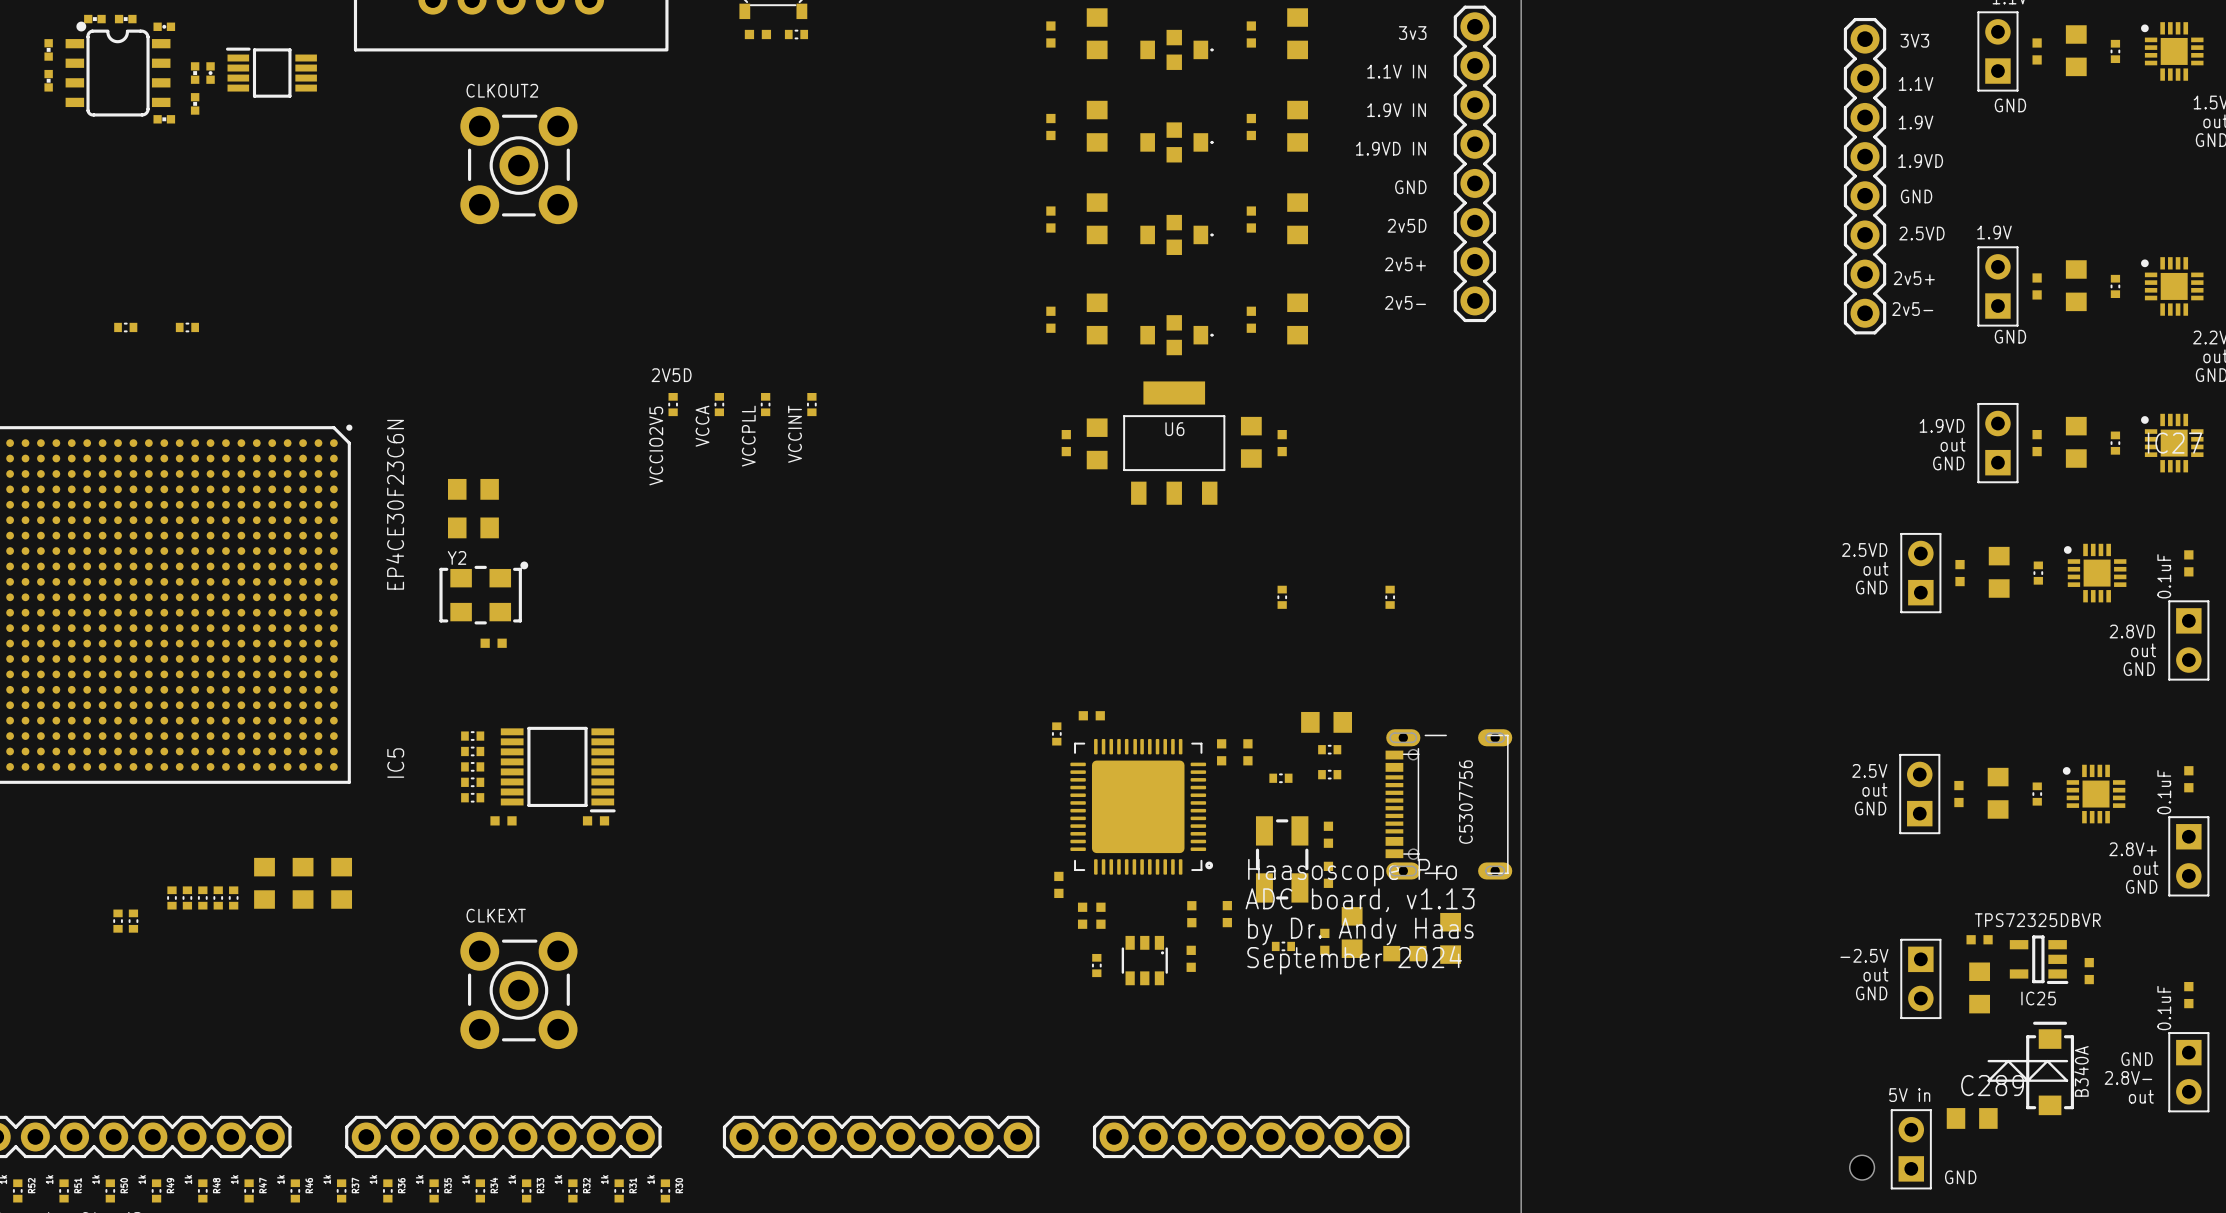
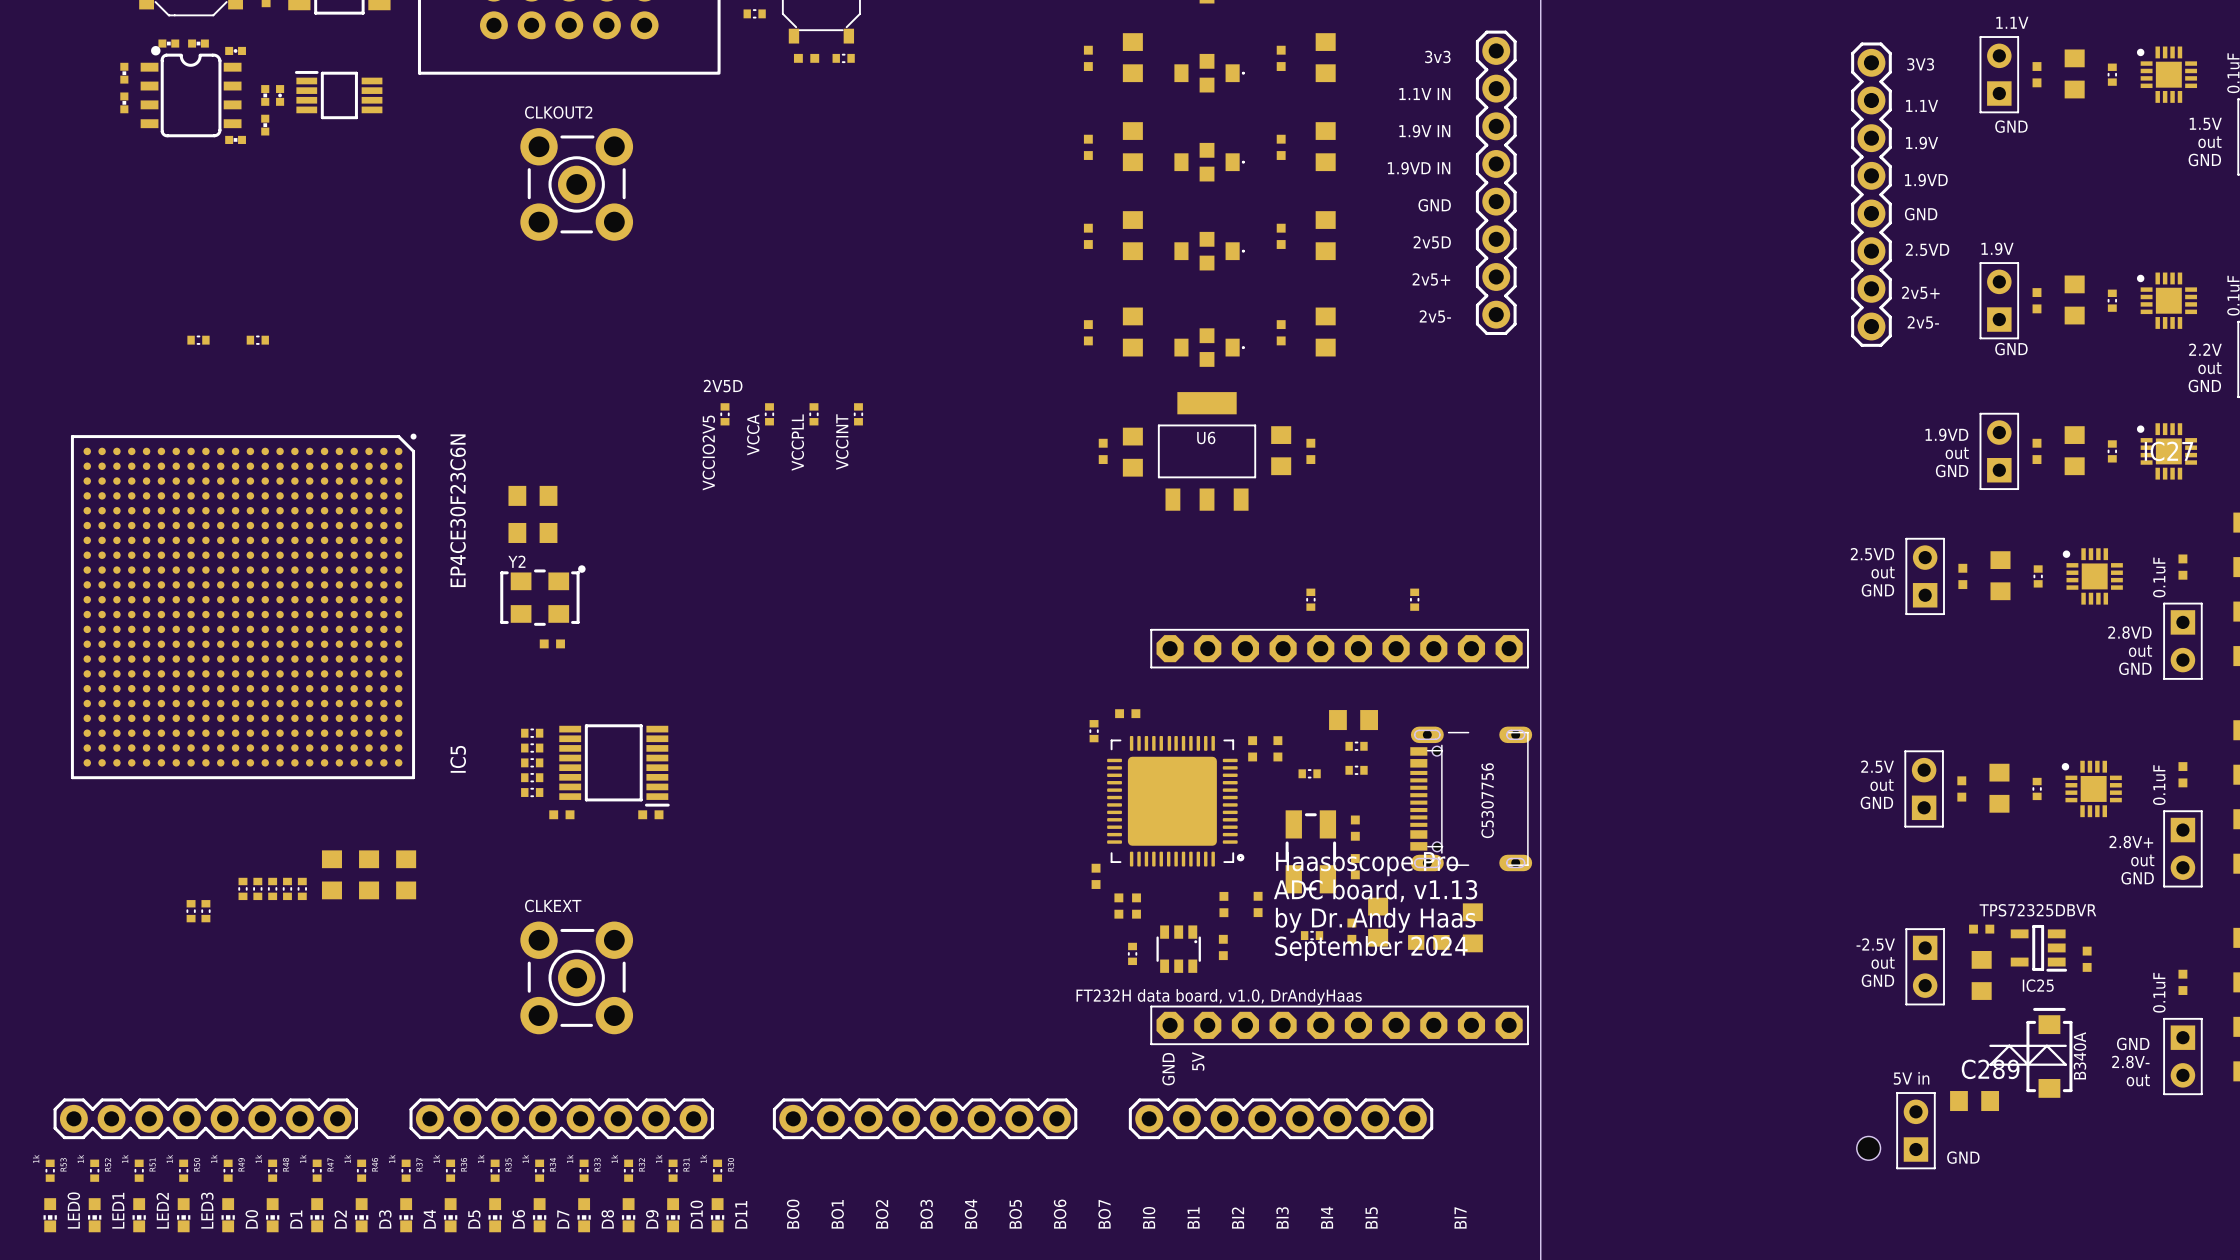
part: none -> (1339, 648)
text: none -> FT232H data board, v1.0, DrAndyHaas (1219, 997)
part: none -> (1339, 1025)
text: none -> 5V (1198, 1061)
text: none -> GND (1168, 1069)

